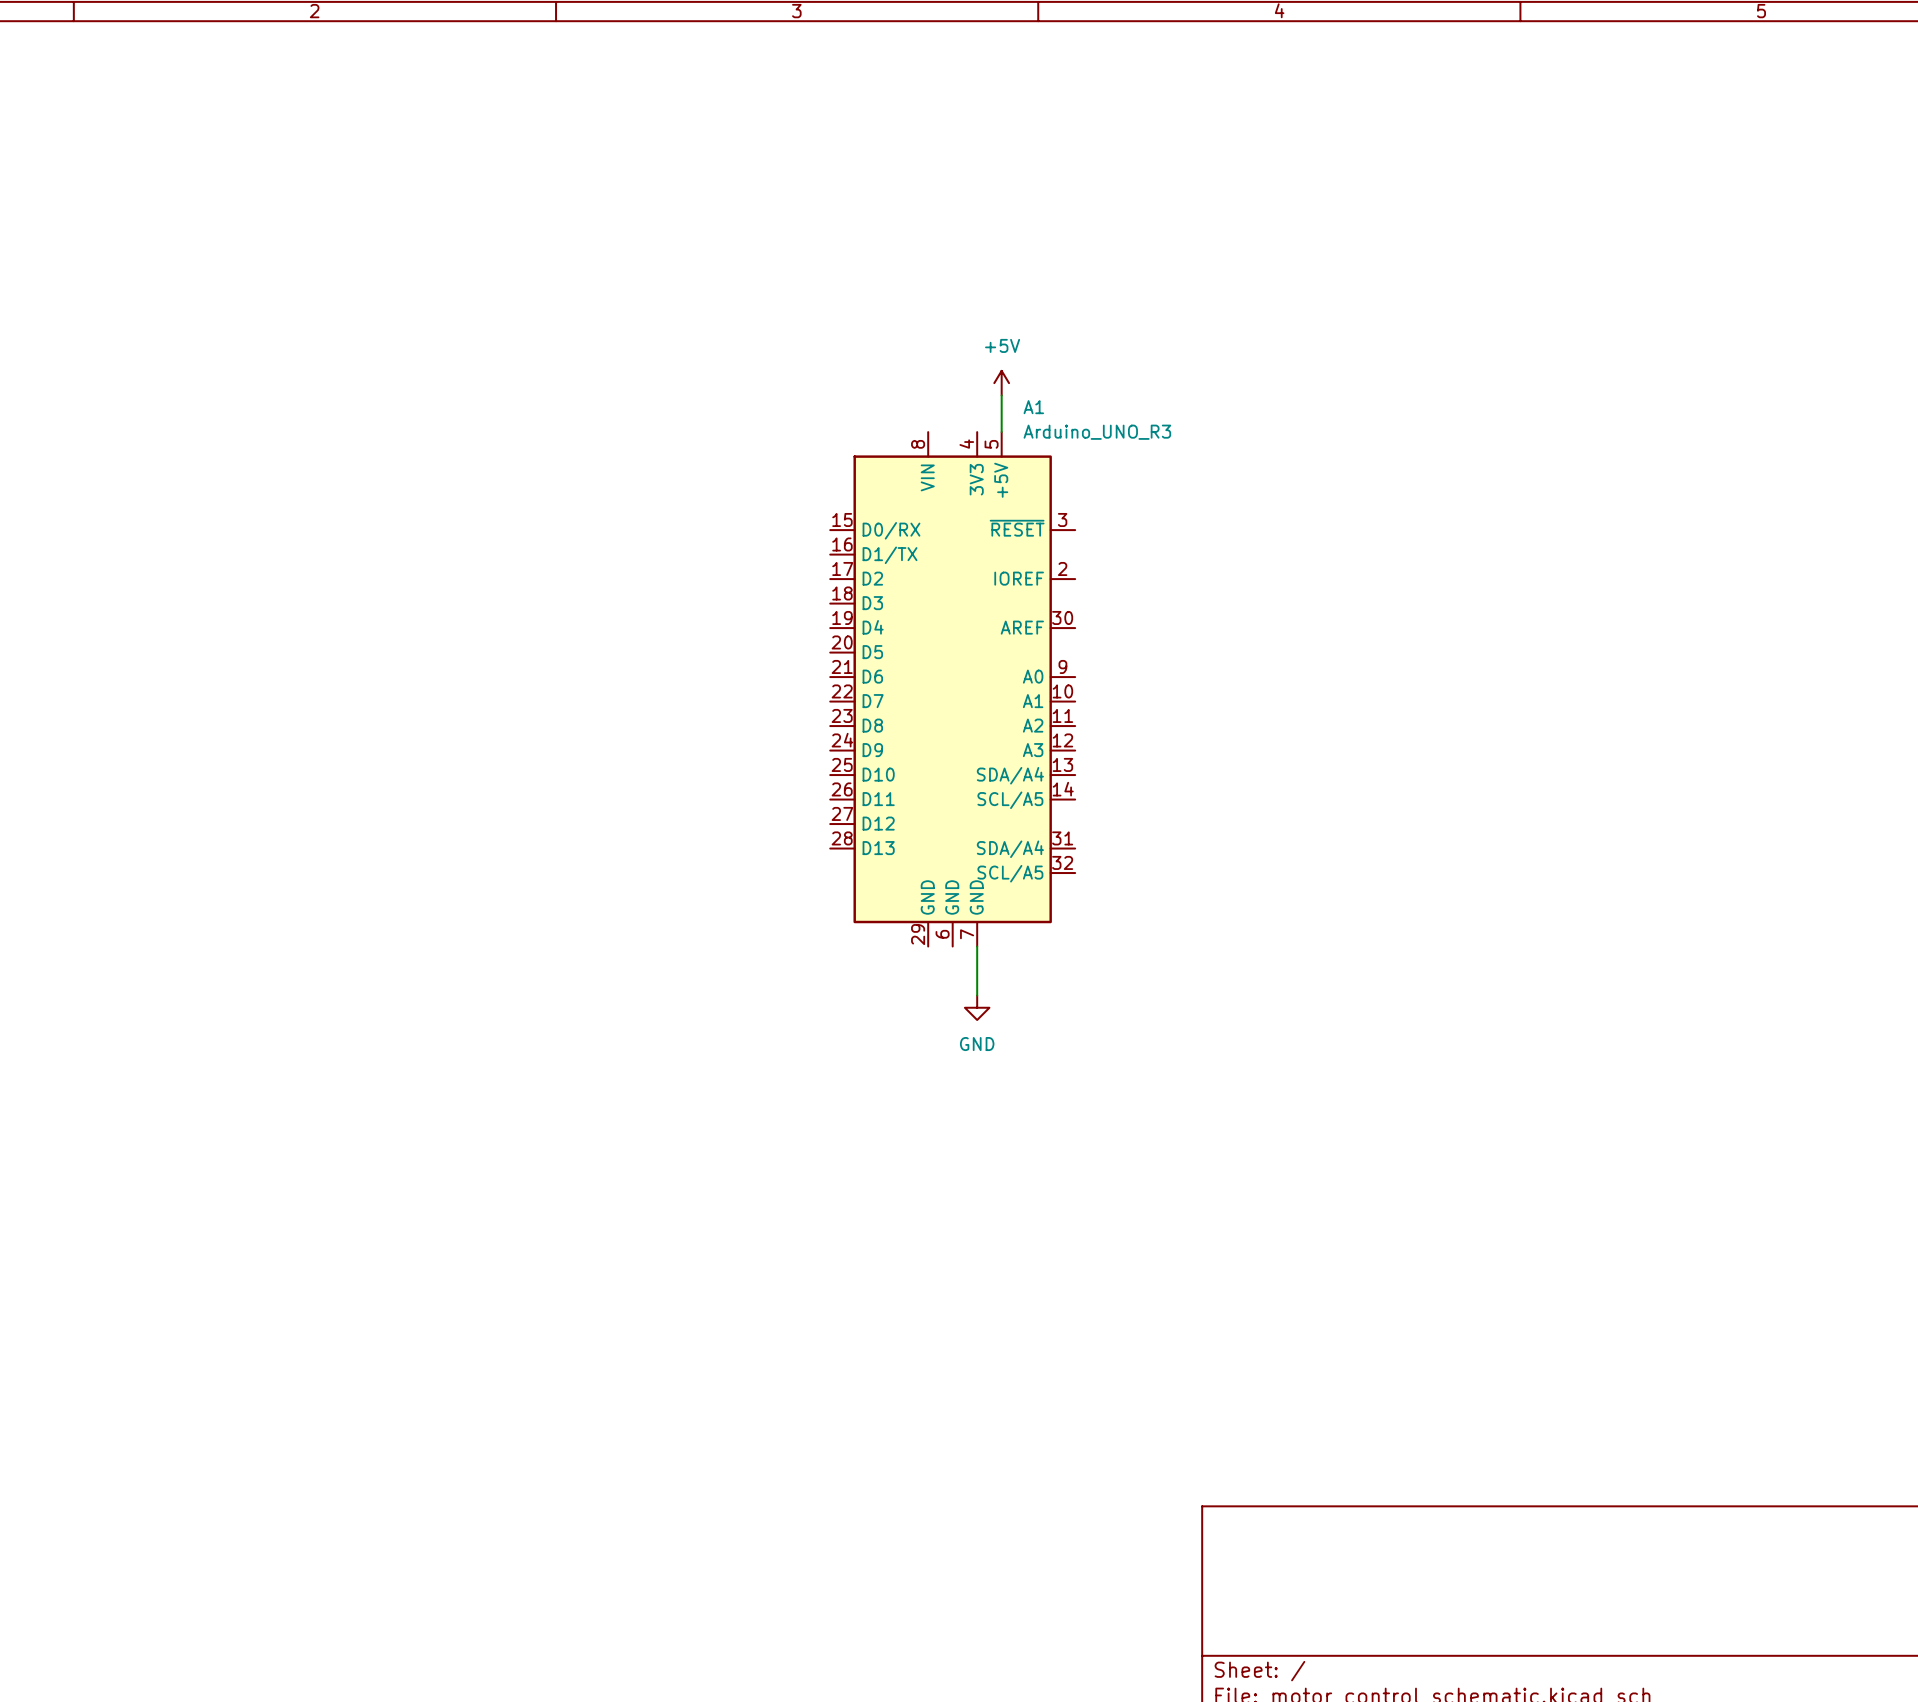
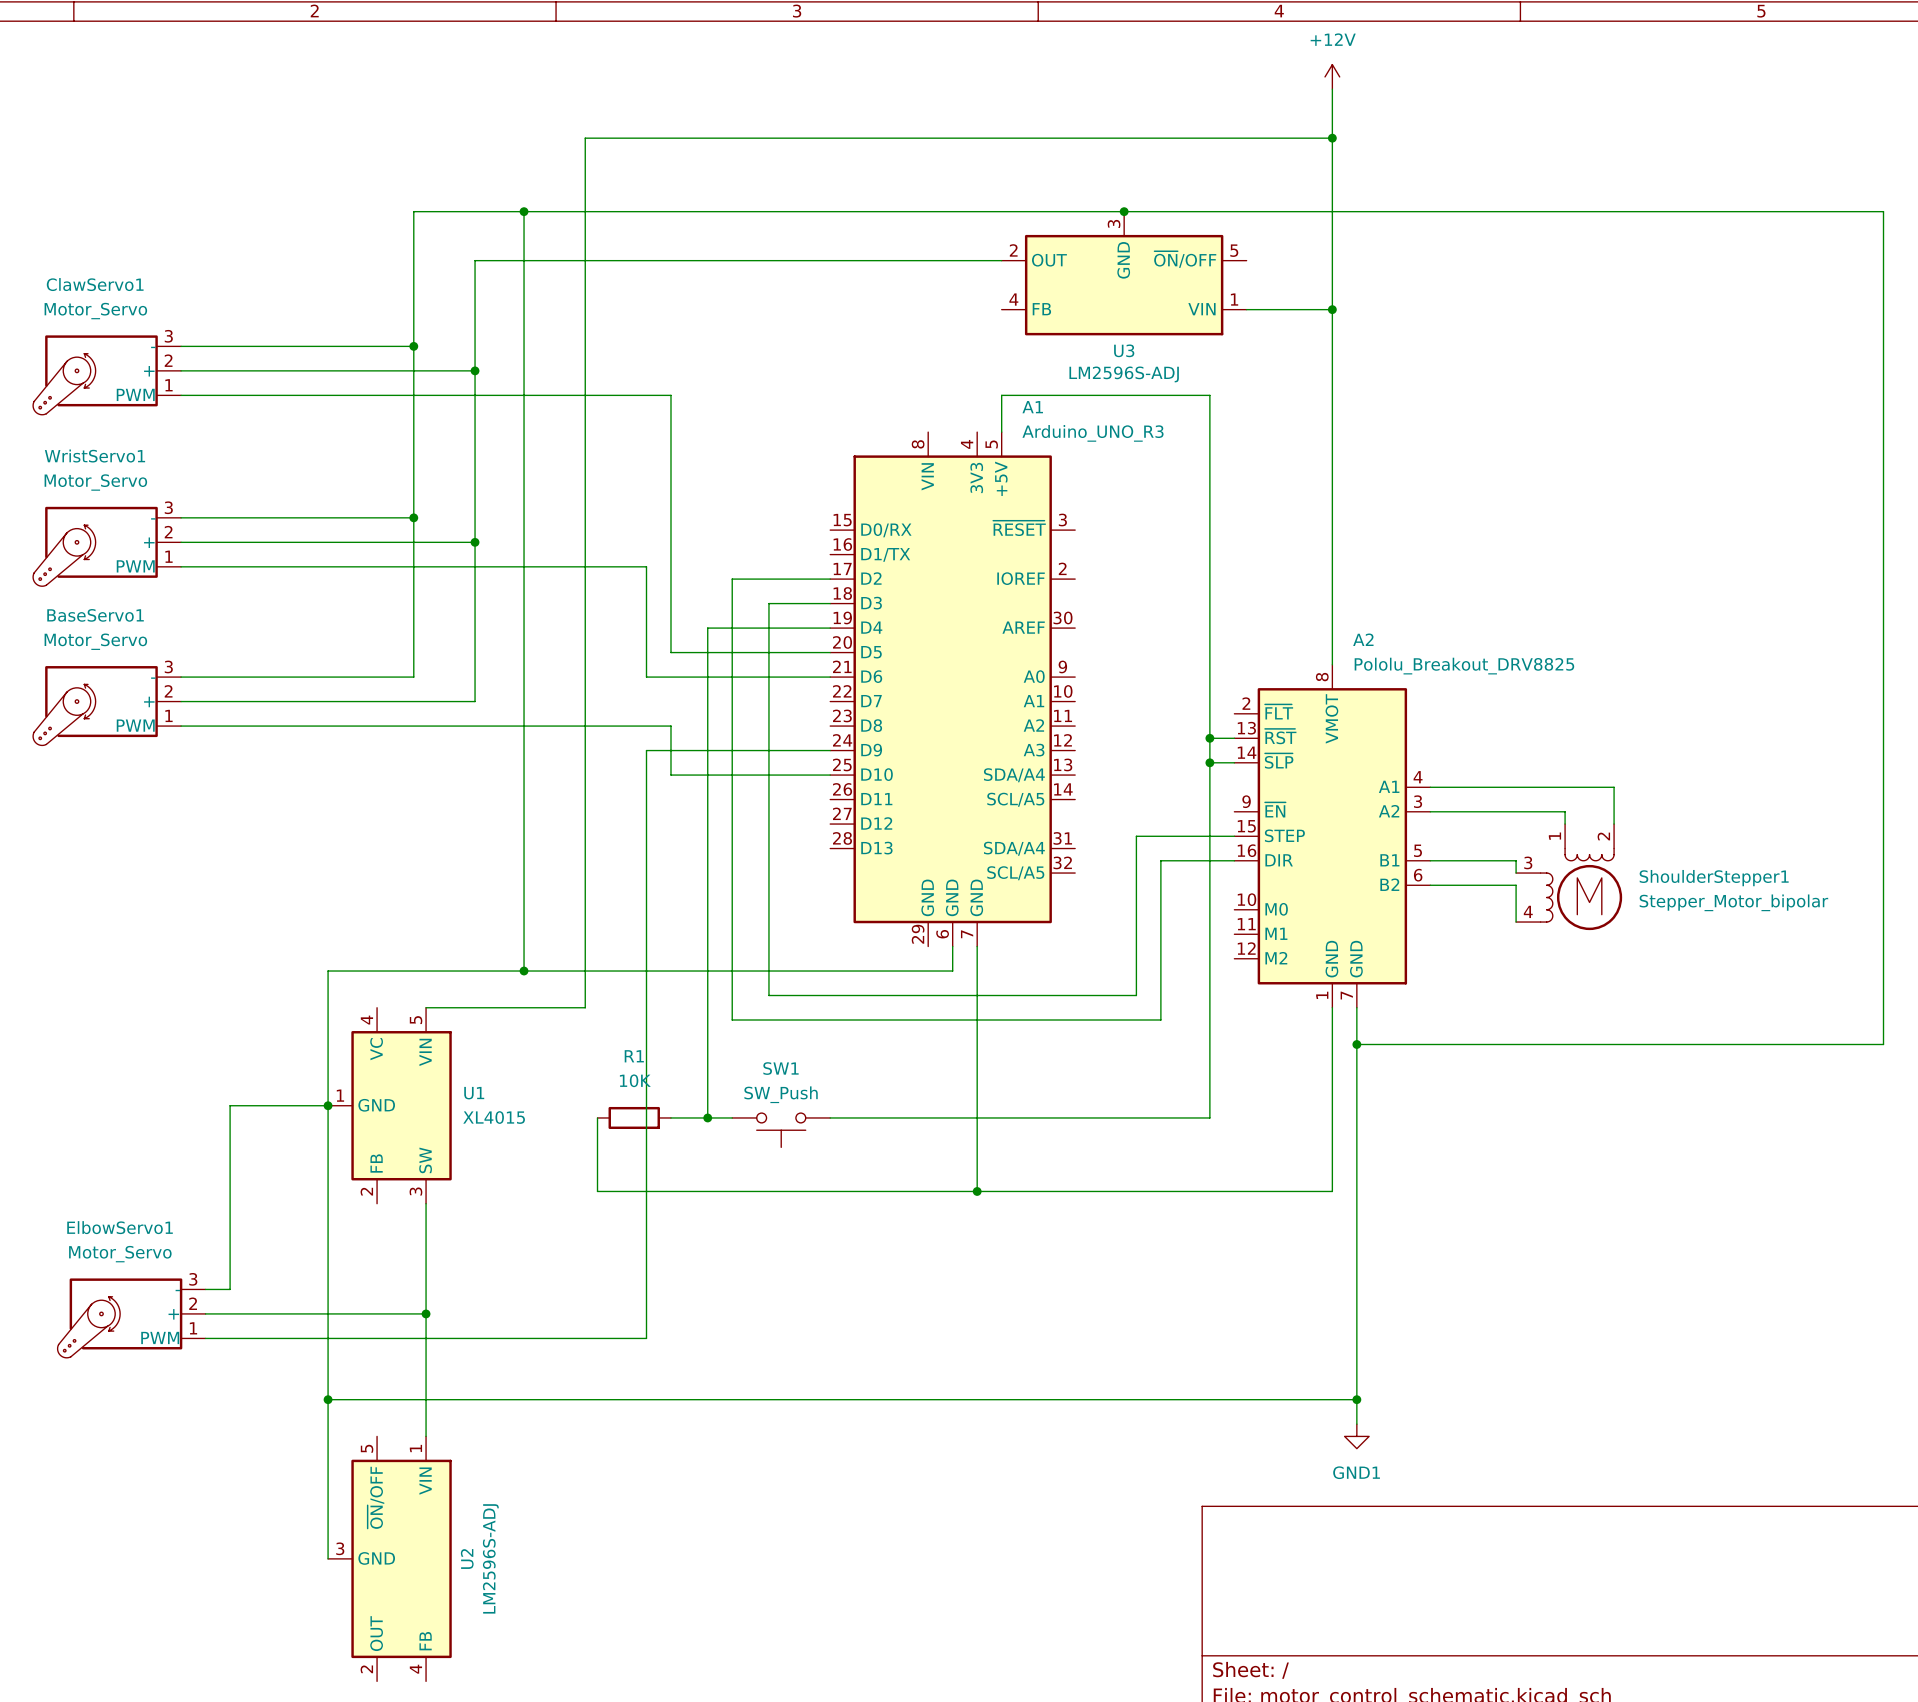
power symbol: none -> +12V (1332, 76)
wire: none -> (1332, 89) (1332, 664)
wire: none -> (1332, 138) (585, 138) (585, 1007) (426, 1007)
junction: none -> (1332, 138)
wire: none -> (524, 211) (524, 971)
junction: none -> (524, 211)
junction: none -> (1124, 211)
wire: none -> (1001, 260) (475, 260) (475, 701) (181, 701)
U3: none -> LM2596S-ADJ (1124, 273)
wire: none -> (1246, 309) (1332, 309)
junction: none -> (1332, 309)
wire: none -> (181, 346) (413, 346)
junction: none -> (413, 346)
wire: none -> (181, 370) (475, 370)
junction: none -> (475, 370)
ClawServo1: none -> Motor_Servo (107, 375)
power symbol: +5V (1001, 383) -> none
wire: none -> (181, 395) (670, 395) (670, 652) (830, 652)
wire: none -> (1001, 395) (1209, 395) (1209, 1117) (830, 1117)
wire: none -> (181, 517) (413, 517)
junction: none -> (413, 517)
wire: none -> (181, 542) (475, 542)
junction: none -> (475, 542)
WristServo1: none -> Motor_Servo (107, 546)
wire: none -> (181, 566) (646, 566) (646, 677) (830, 677)
wire: none -> (830, 579) (732, 579) (732, 1020) (1160, 1020) (1160, 860) (1234, 860)
wire: none -> (830, 603) (768, 603) (768, 995) (1136, 995) (1136, 836) (1234, 836)
wire: none -> (830, 628) (707, 628) (707, 1117)
wire: none -> (181, 677) (413, 677) (413, 211) (1883, 211) (1883, 1044) (1356, 1044)
BaseServo1: none -> Motor_Servo (107, 705)
wire: none -> (181, 726) (670, 726) (670, 775) (830, 775)
wire: none -> (1209, 738) (1234, 738)
junction: none -> (1209, 738)
wire: none -> (830, 750) (646, 750) (646, 1338) (205, 1338)
wire: none -> (1209, 762) (1234, 762)
junction: none -> (1209, 762)
wire: none -> (1430, 787) (1614, 787) (1614, 824)
wire: none -> (1430, 811) (1565, 811) (1565, 824)
A2: none -> Pololu_Breakout_DRV8825 (1332, 836)
wire: none -> (1430, 860) (1516, 860) (1516, 873)
ShoulderStepper1: none -> Stepper_Motor_bipolar (1569, 877)
wire: none -> (1430, 885) (1516, 885) (1516, 922)
wire: none -> (952, 946) (952, 971) (328, 971) (328, 1558)
junction: none -> (524, 971)
wire: none -> (977, 995) (977, 1191)
power symbol: GND (977, 1007) -> none
wire: none -> (1332, 1007) (1332, 1191) (597, 1191) (597, 1117)
wire: none -> (1356, 1007) (1356, 1424)
junction: none -> (1356, 1044)
wire: none -> (328, 1105) (230, 1105) (230, 1289) (205, 1289)
junction: none -> (328, 1105)
U1: none -> XL4015 (389, 1105)
R1: none -> 10K (634, 1117)
wire: none -> (670, 1117) (732, 1117)
junction: none -> (707, 1117)
SW1: none -> SW_Push (781, 1130)
junction: none -> (977, 1191)
wire: none -> (426, 1203) (426, 1436)
wire: none -> (205, 1313) (426, 1313)
junction: none -> (426, 1313)
ElbowServo1: none -> Motor_Servo (131, 1318)
wire: none -> (328, 1399) (1356, 1399)
junction: none -> (328, 1399)
junction: none -> (1356, 1399)
power symbol: none -> GND1 (1356, 1436)
U2: none -> LM2596S-ADJ (389, 1558)

